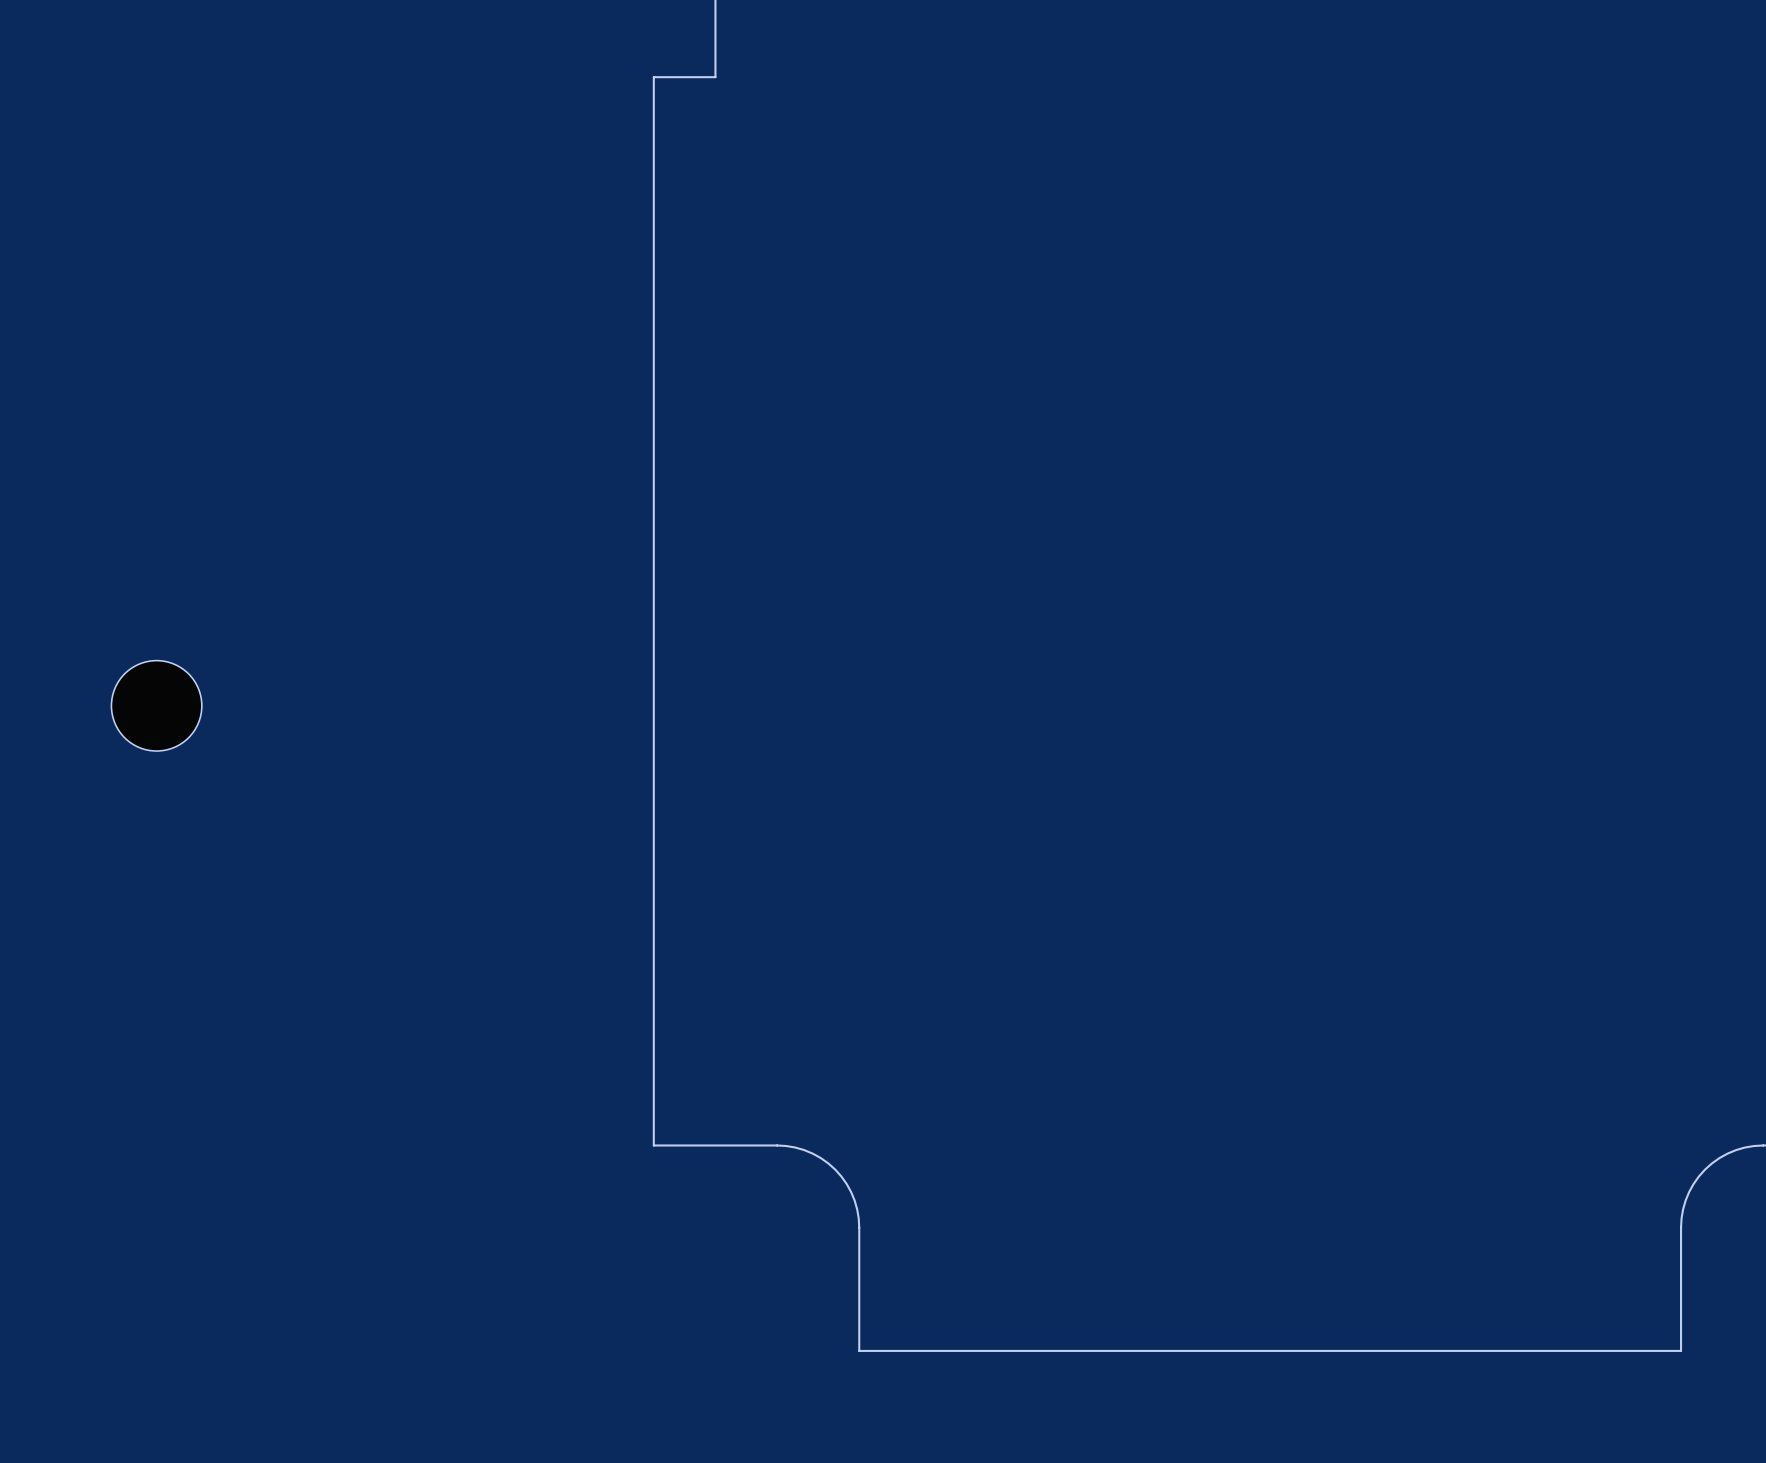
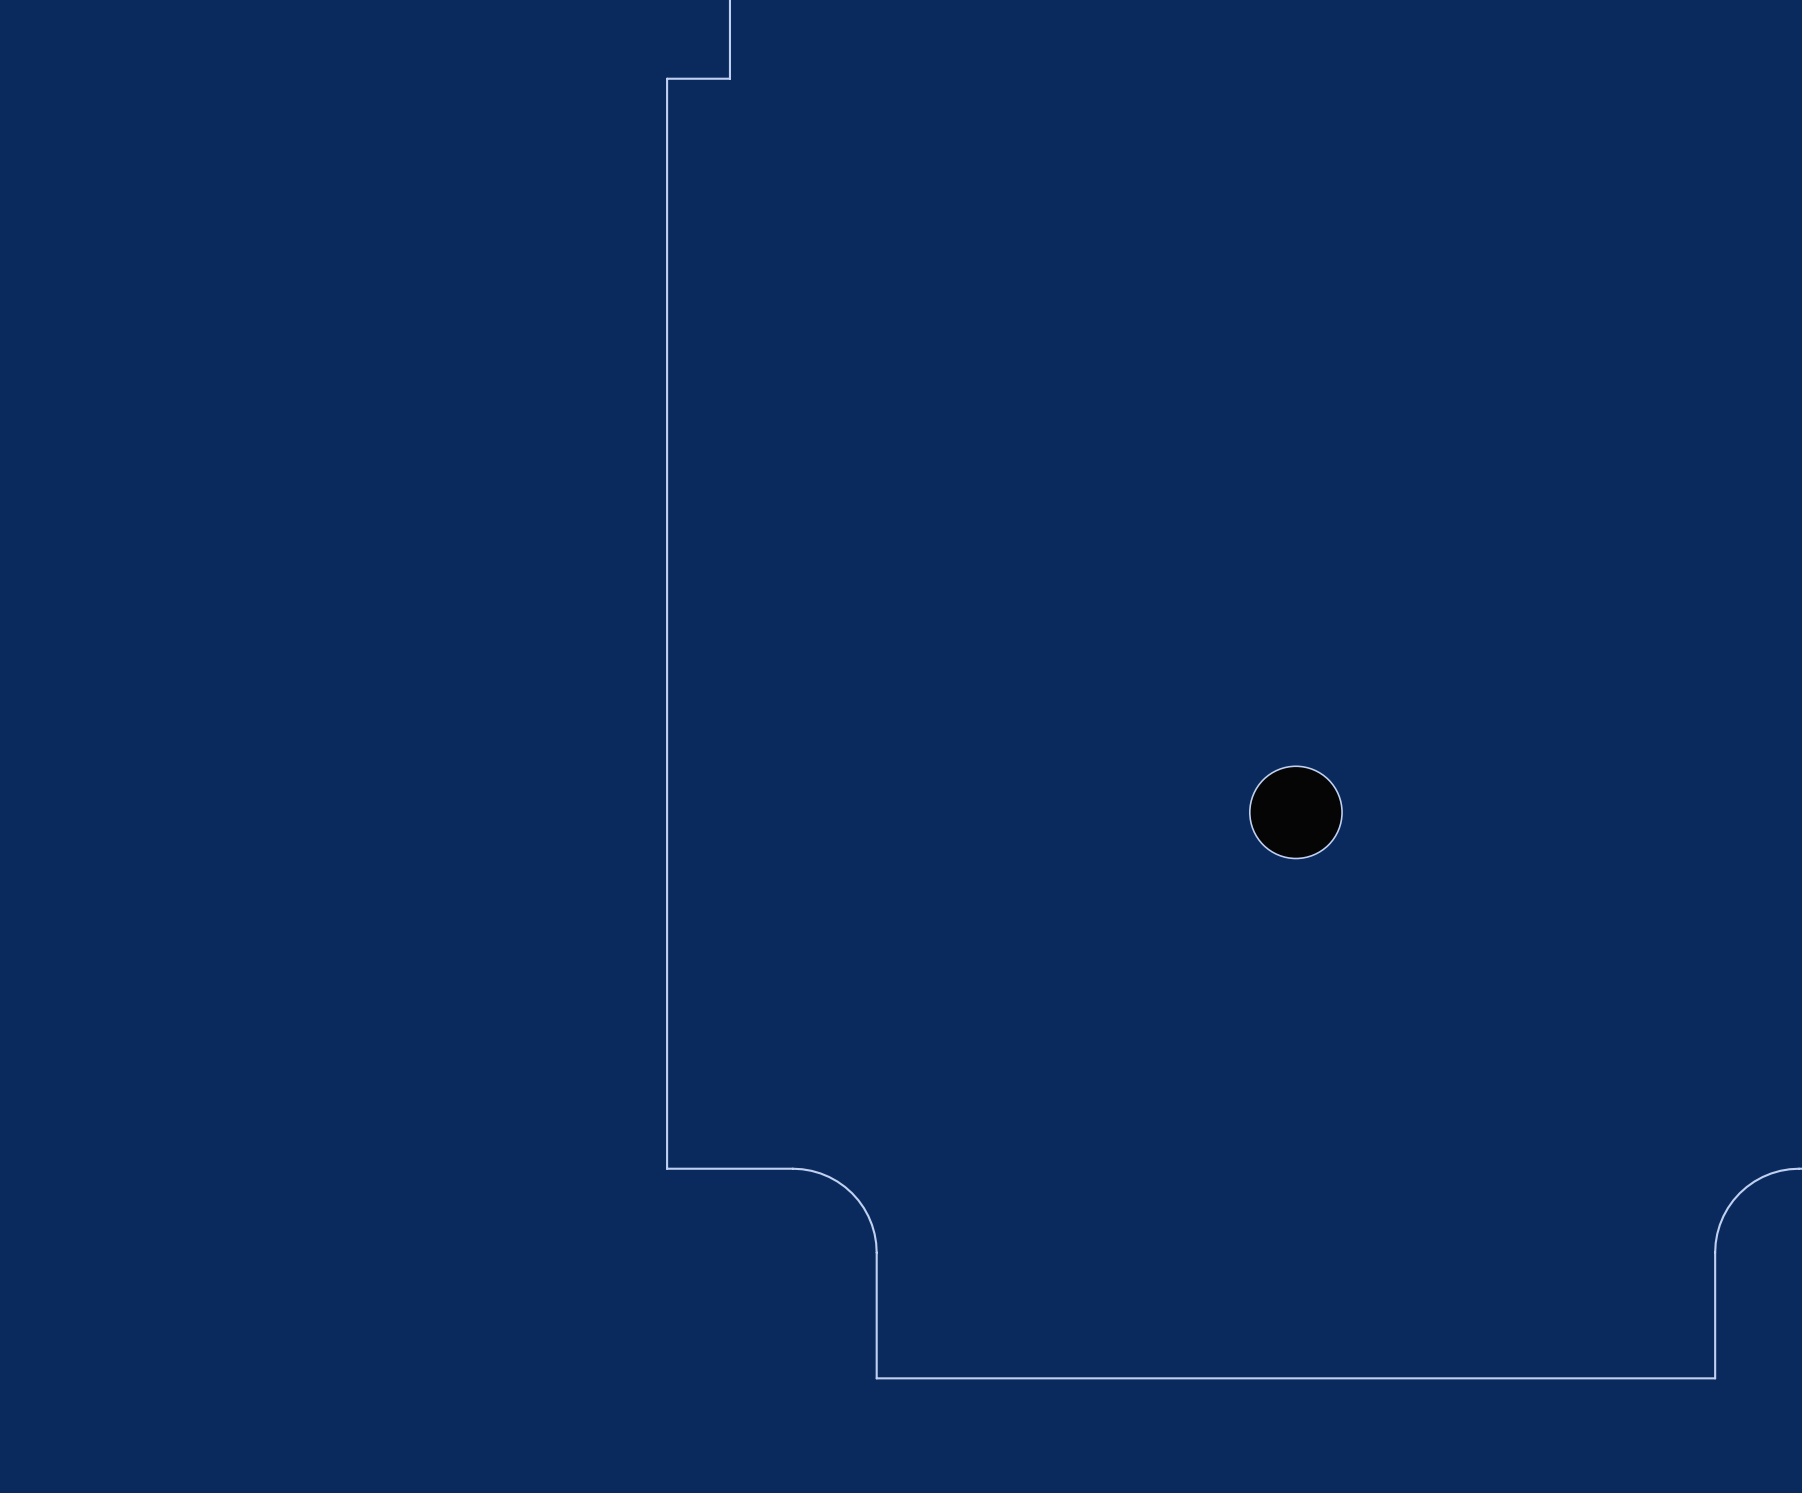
part: (156, 705) -> none
part: none -> (1295, 812)

